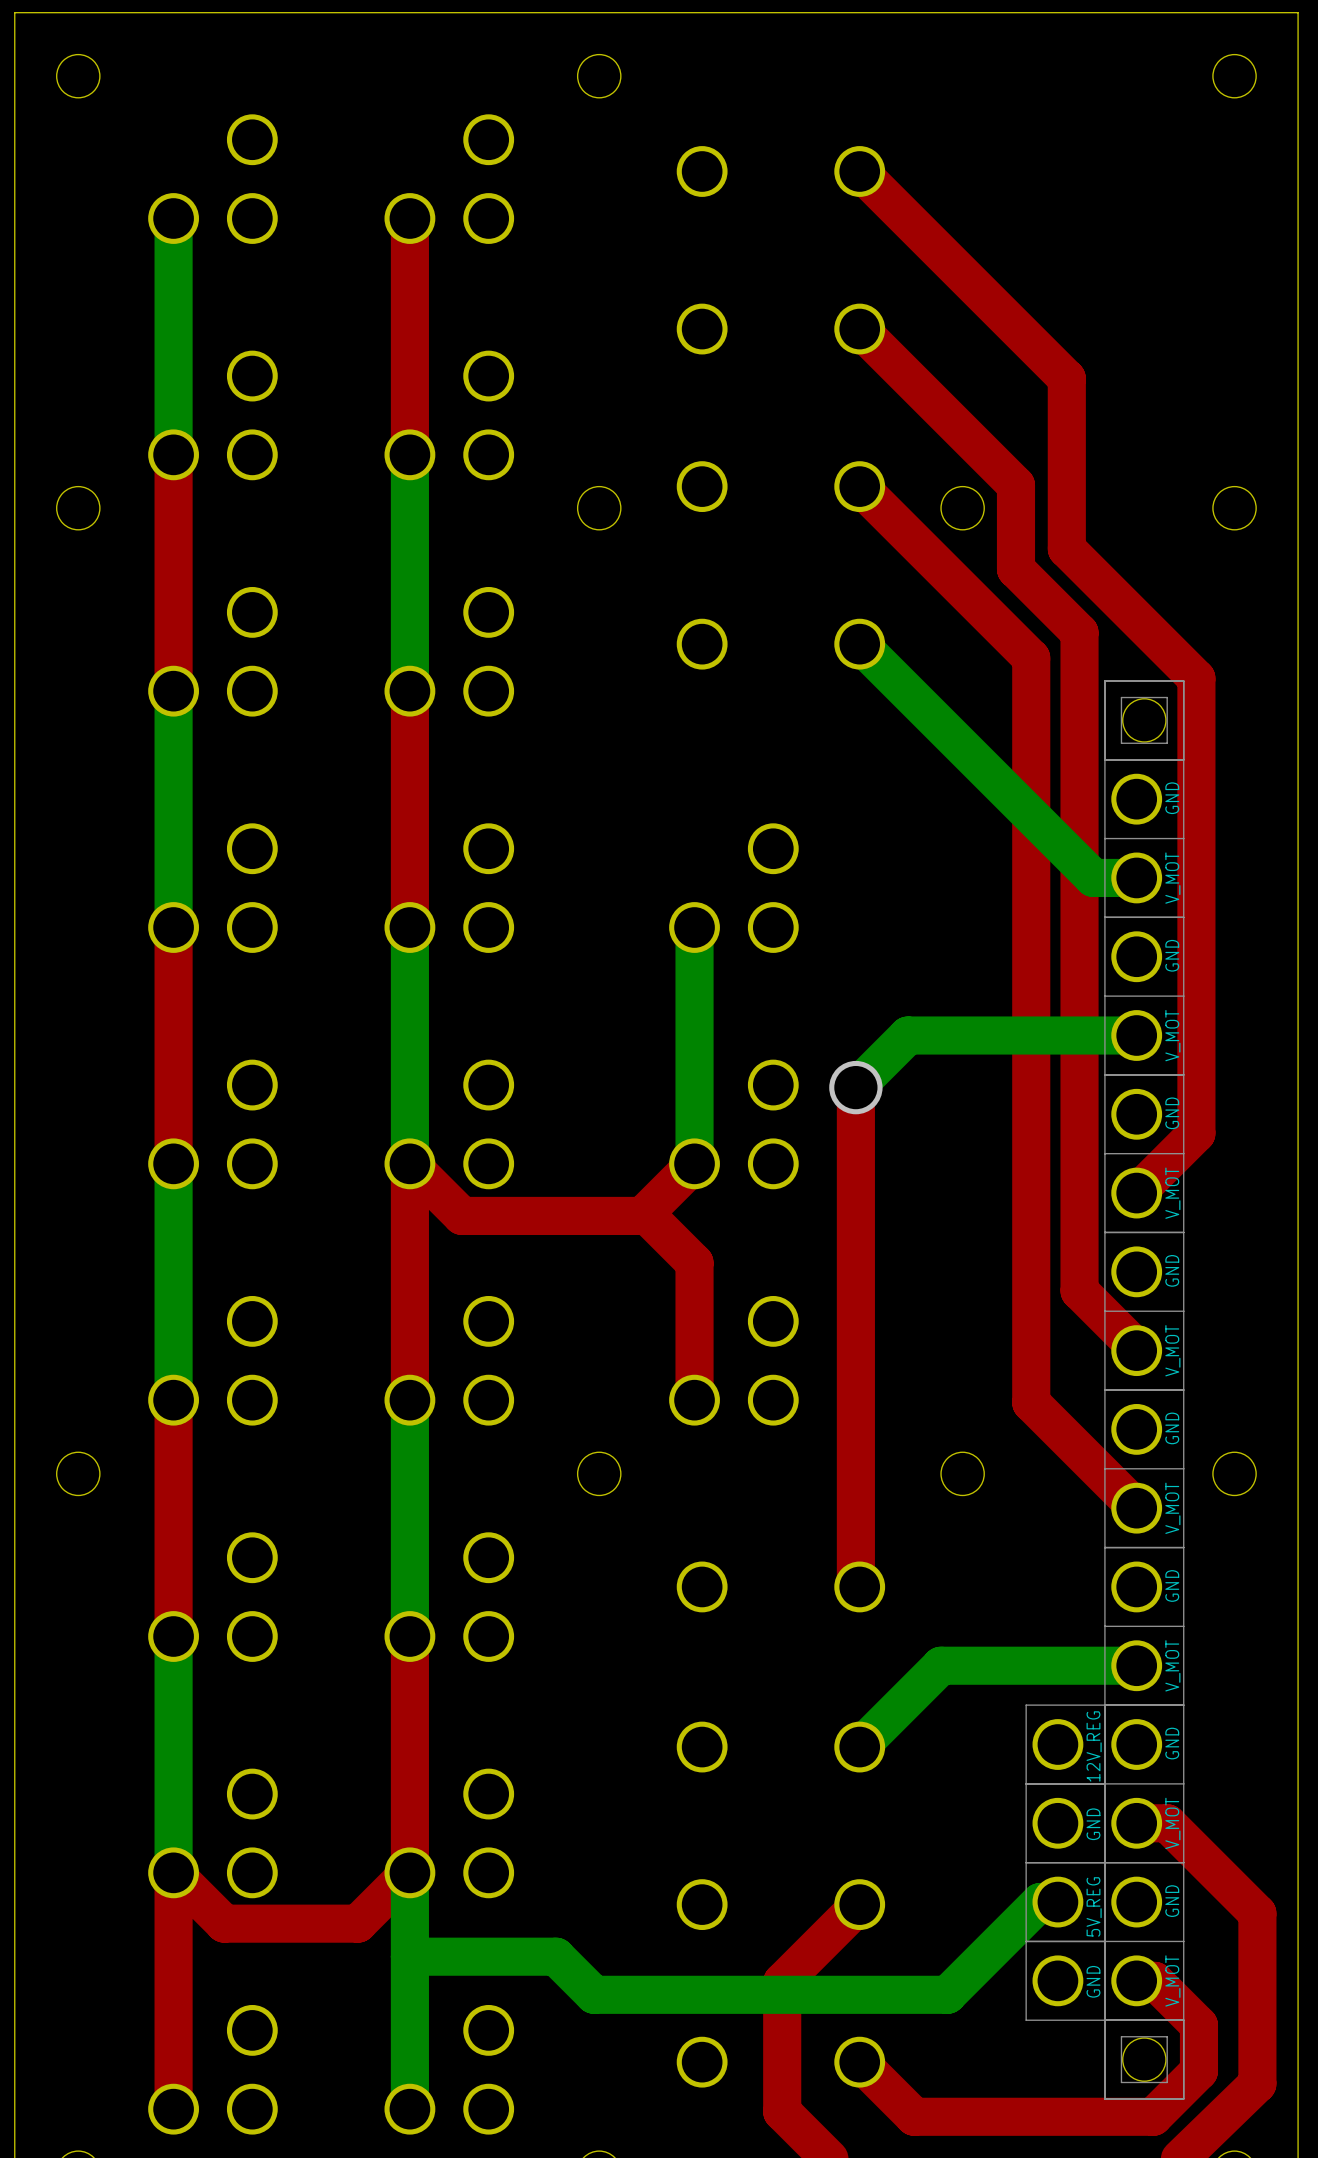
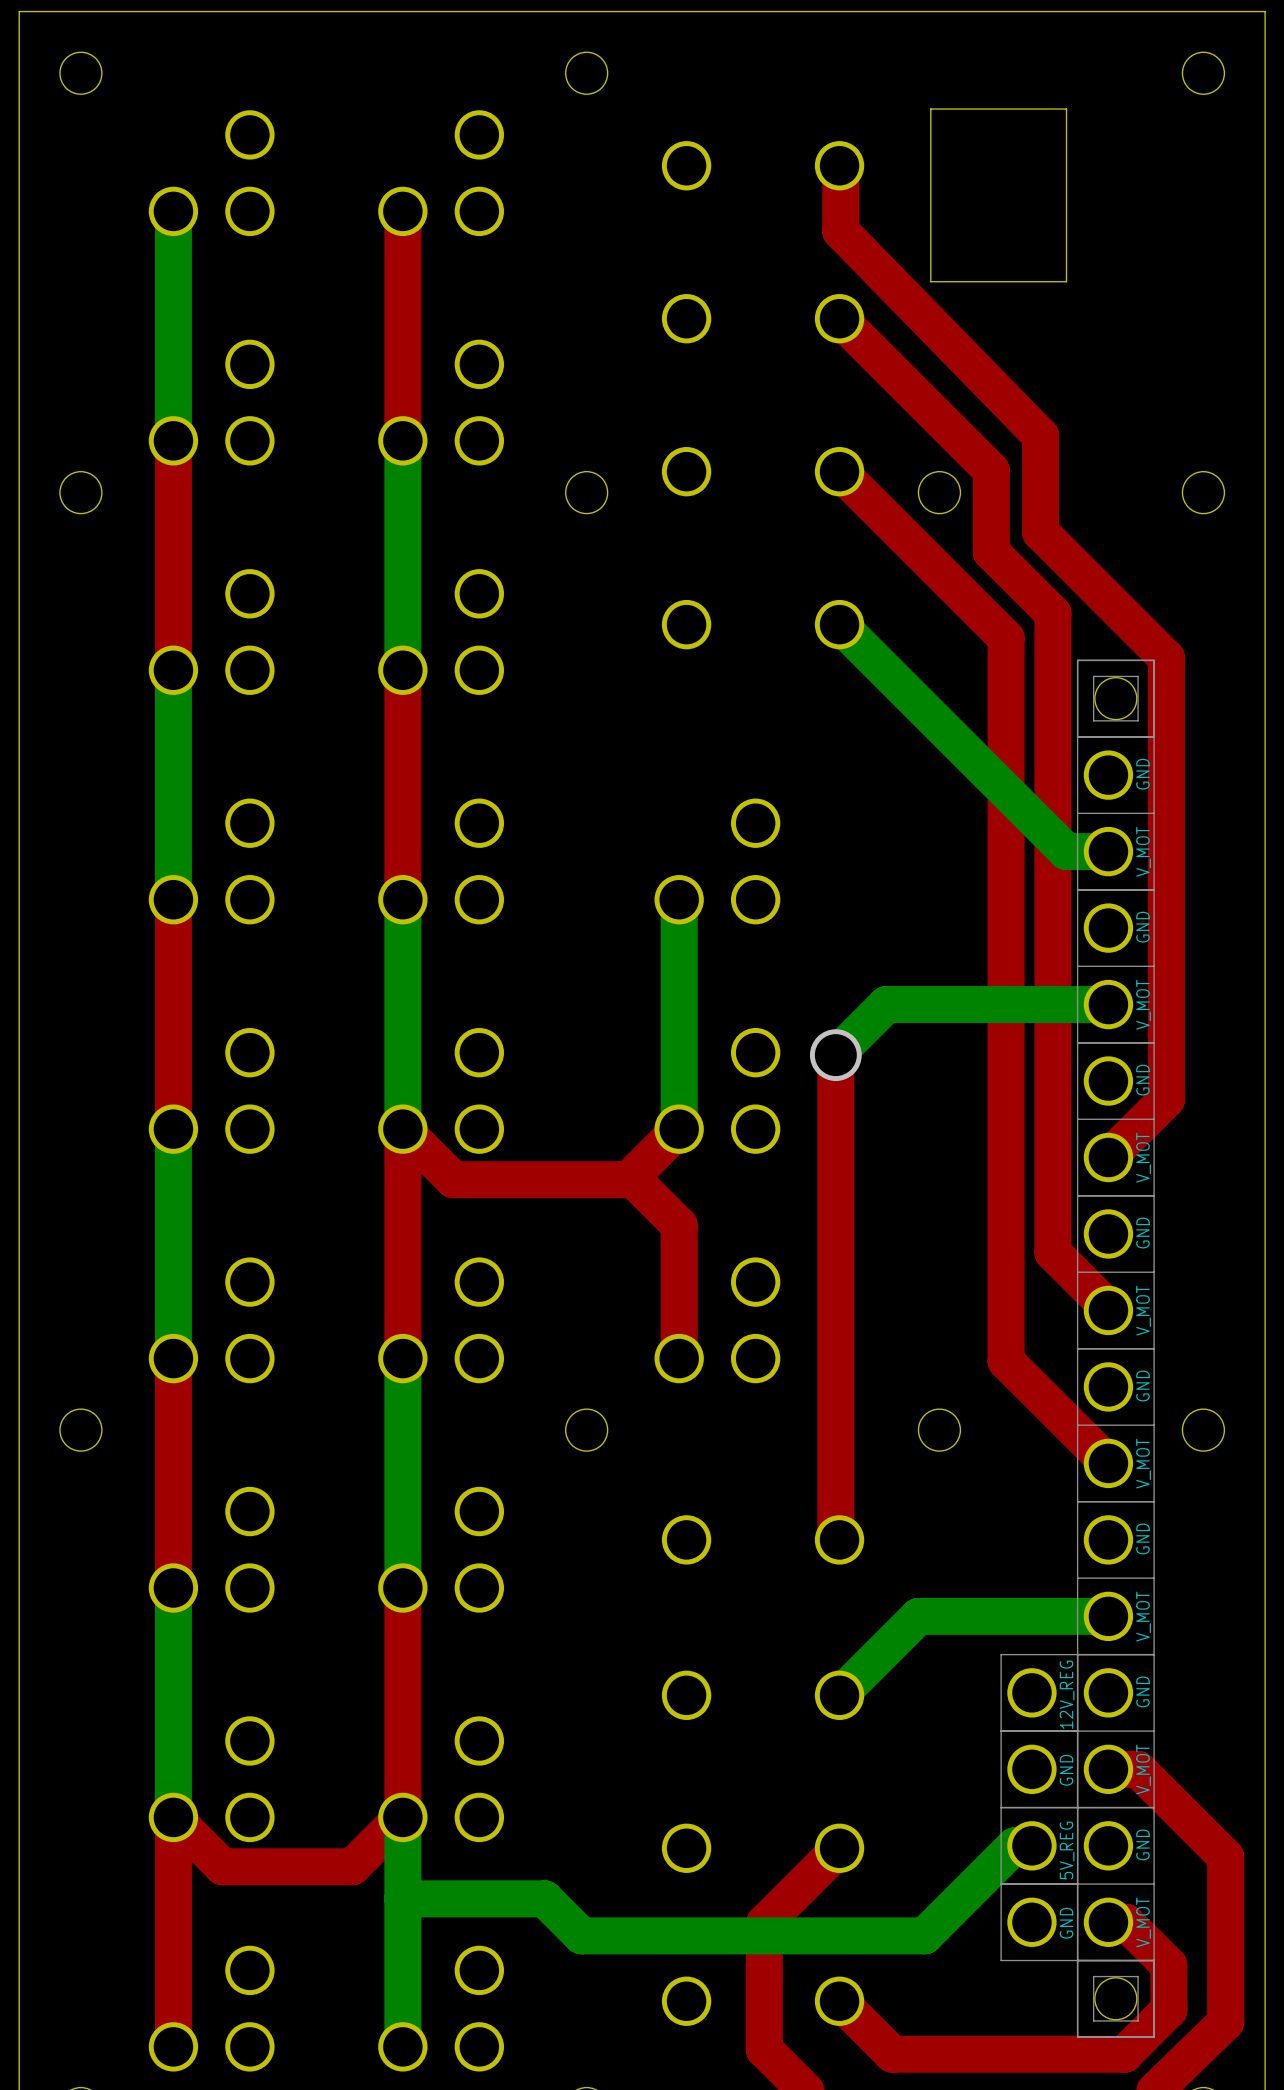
board edge: none -> (1066, 109) (930, 109) (930, 281) (1066, 281) (1066, 109)
top track: (860, 172) (1066, 378) (1066, 449) -> (840, 166) (840, 231) (1040, 435)

